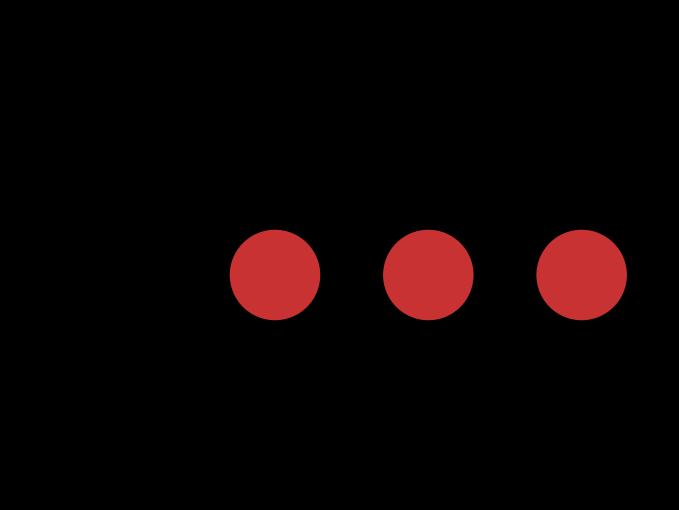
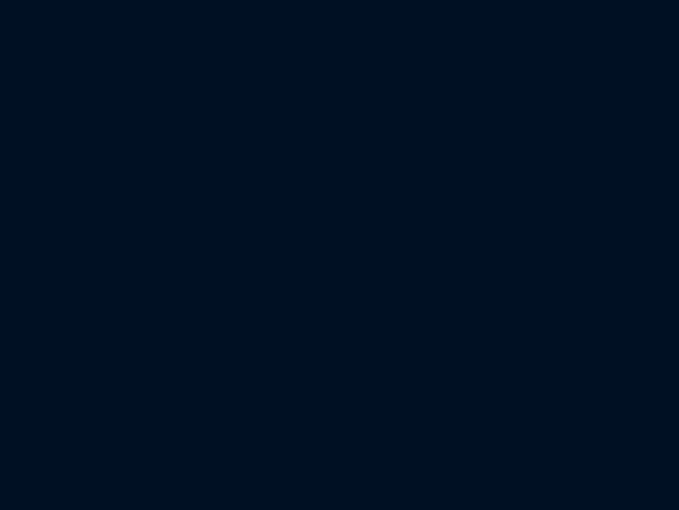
part: (274, 274) -> none
part: (428, 274) -> none
part: (581, 274) -> none

